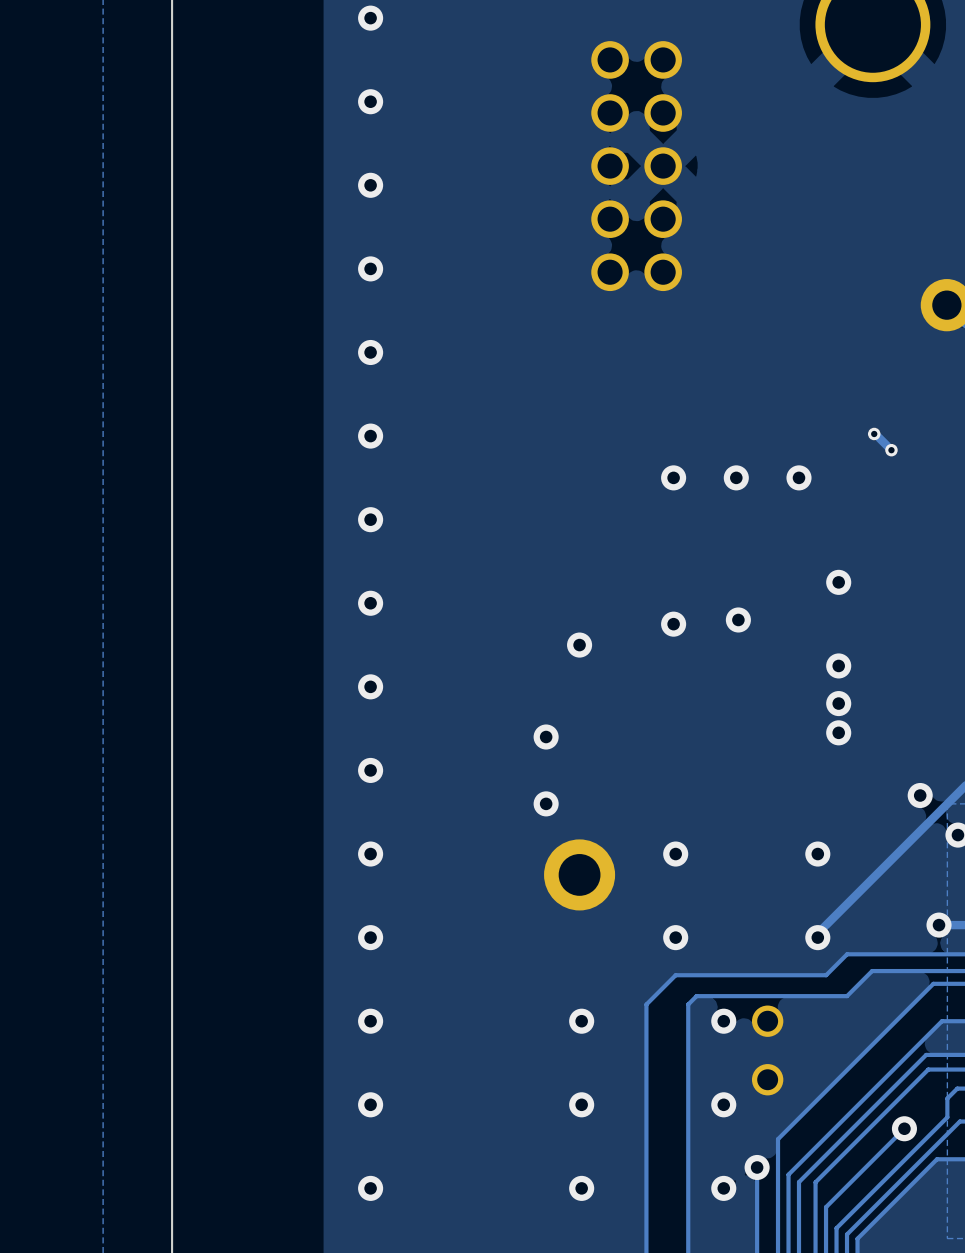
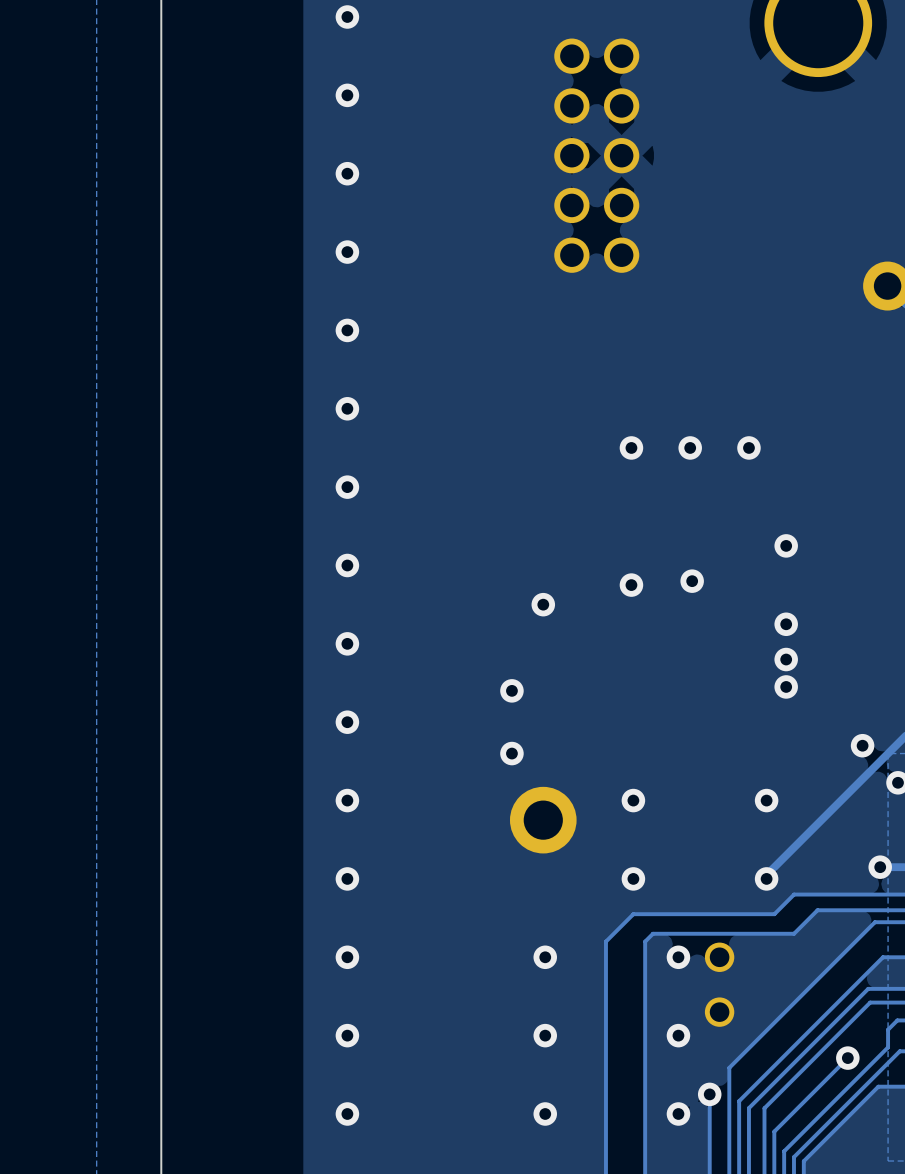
track: (874, 433) (891, 450) -> none
via: (874, 433) -> none
via: (891, 450) -> none

